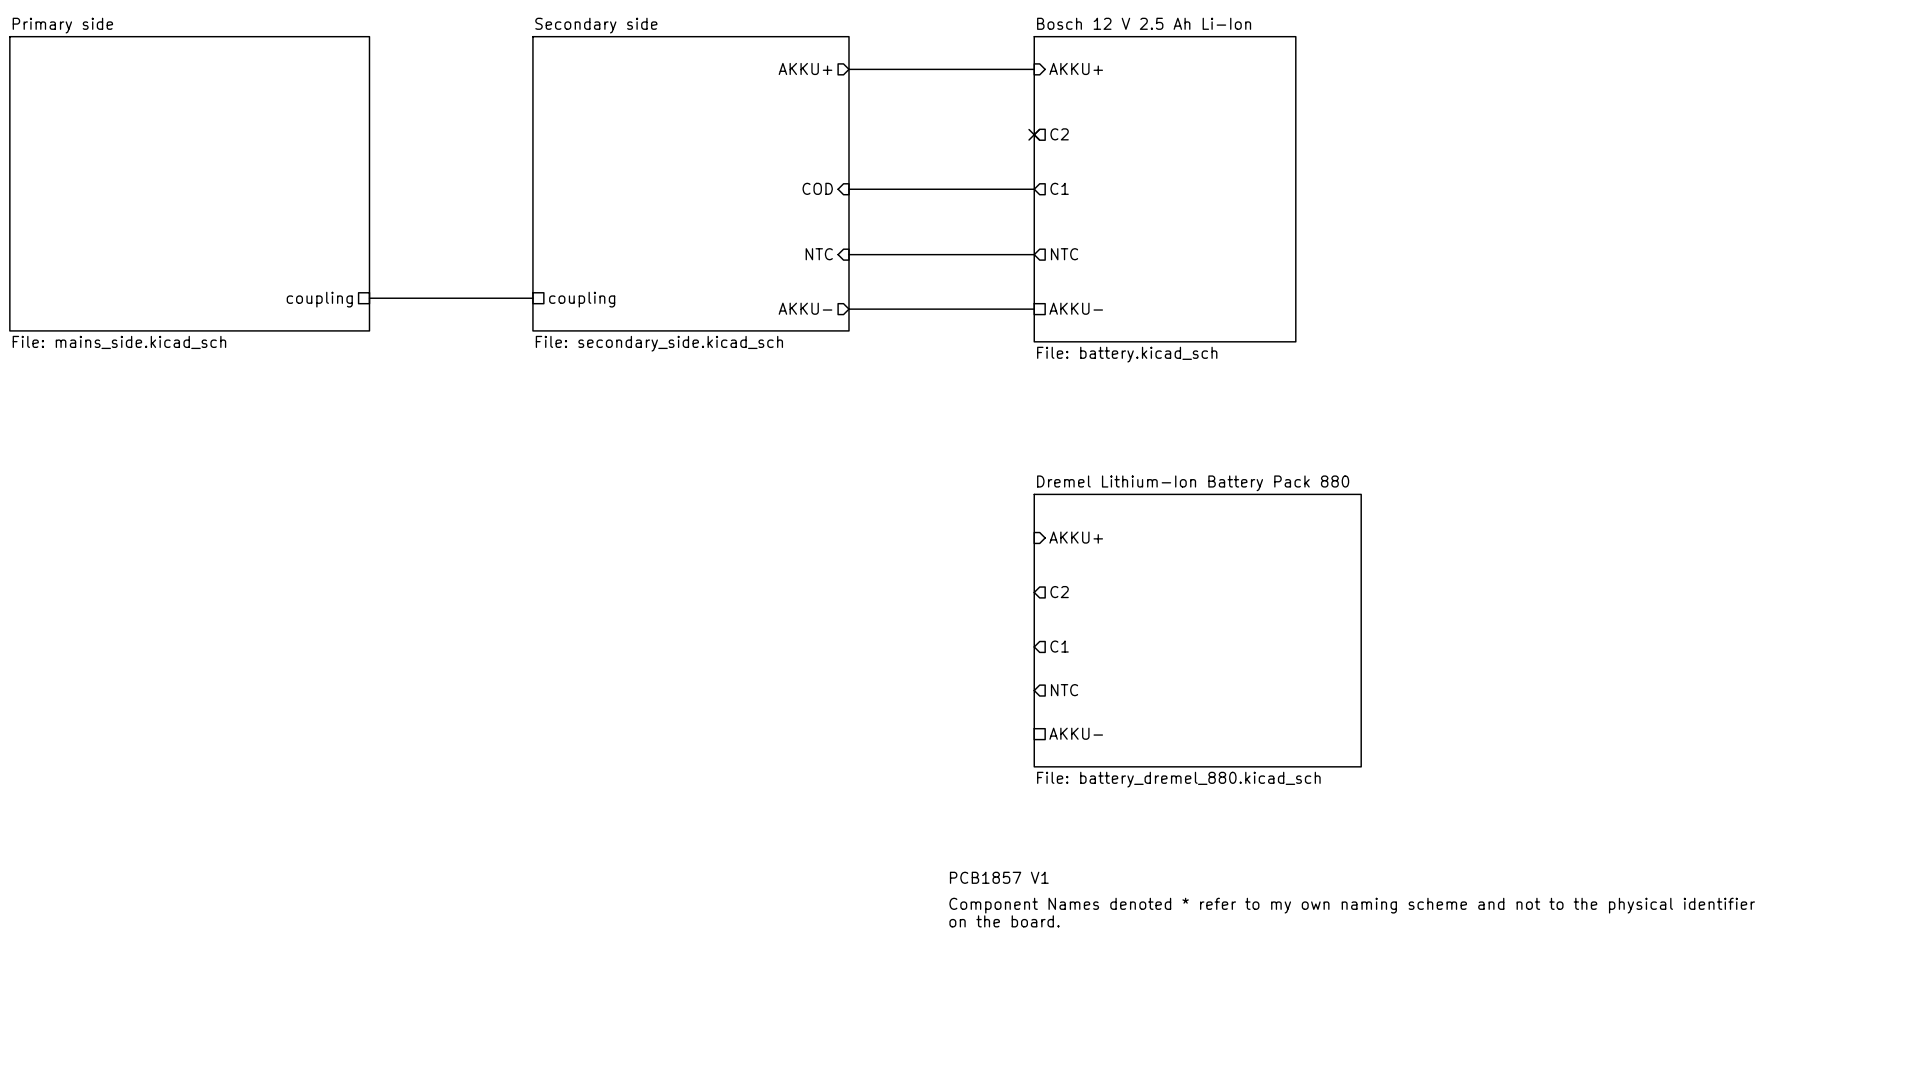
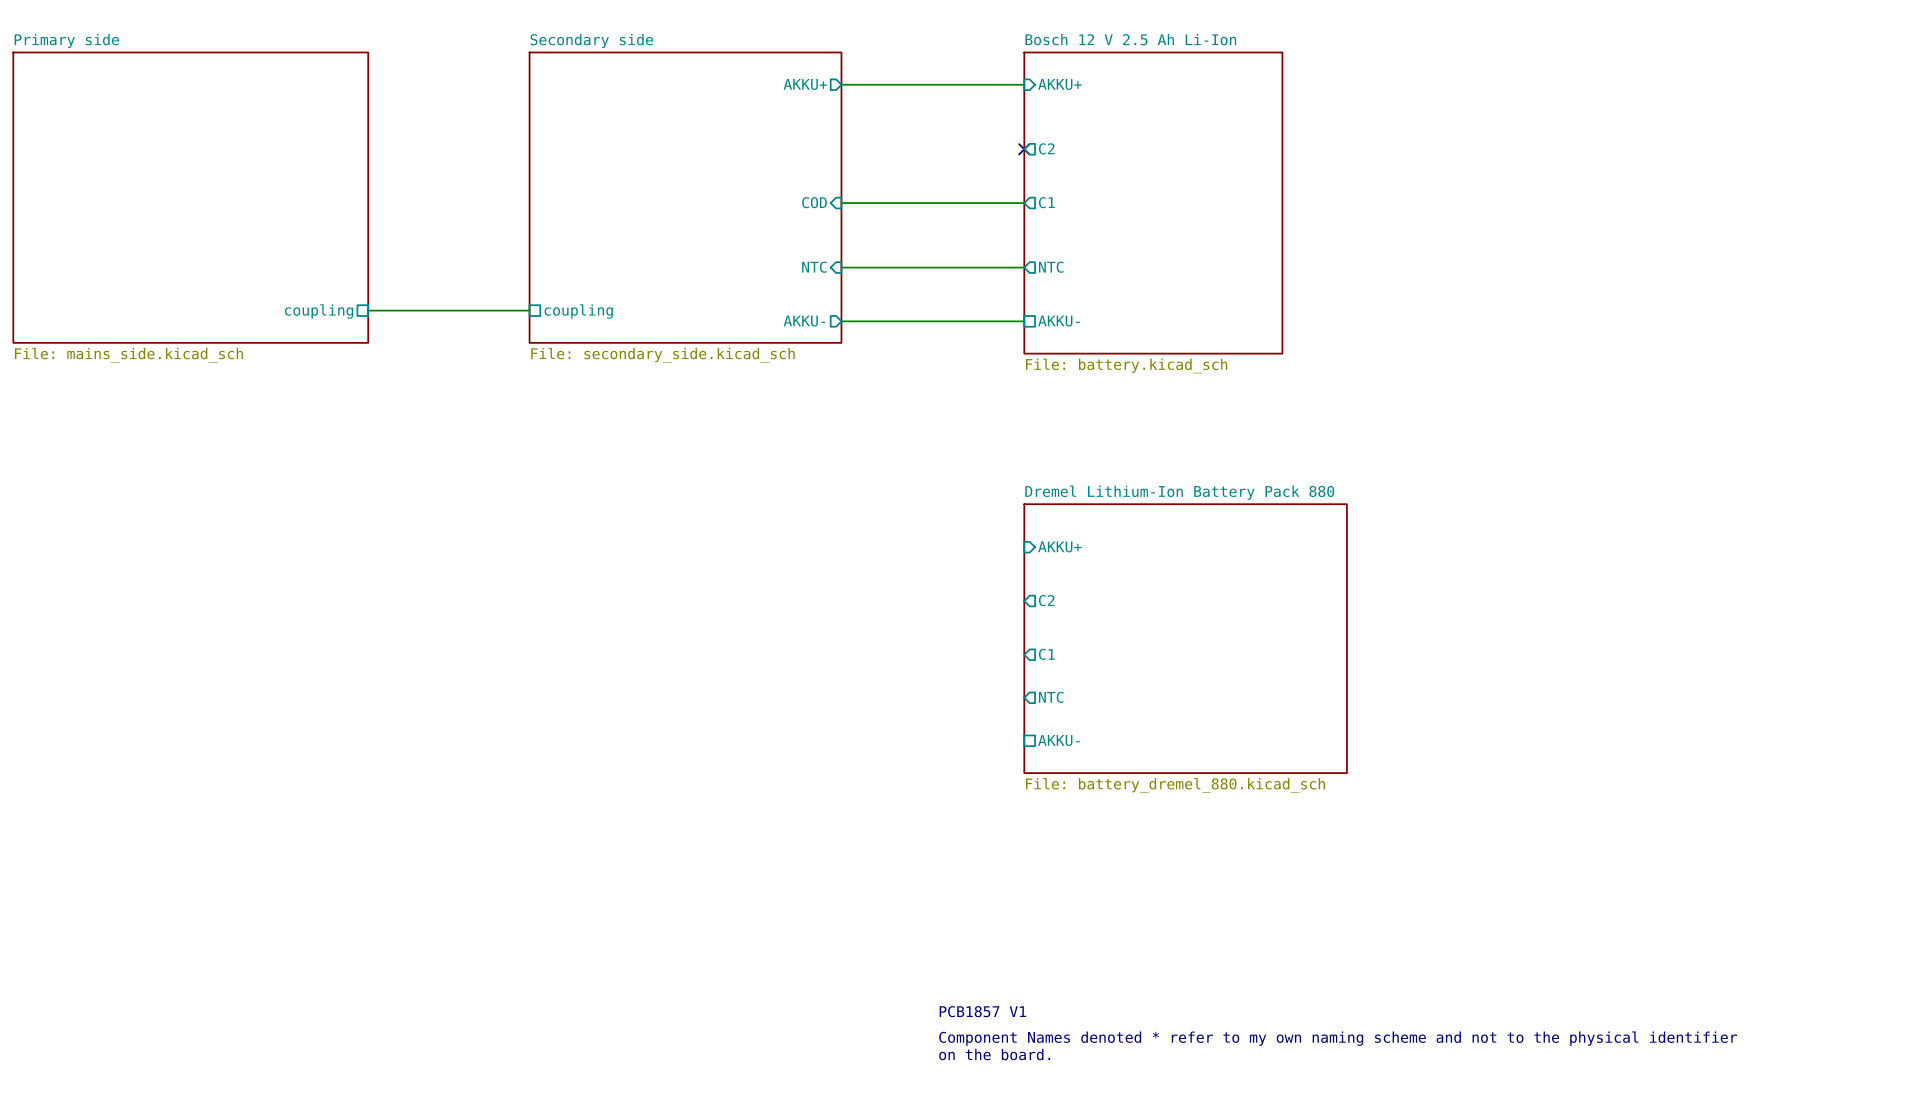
text position: PCB1857 V1 (999, 877) -> PCB1857 V1 (982, 1011)
text position: Component Names denoted * refer to my own naming scheme and not to the physical identifier (1352, 905) -> Component Names denoted * refer to my own naming scheme and not to the physical identifier (1338, 1038)
text position: on the board. (1004, 921) -> on the board. (994, 1054)

